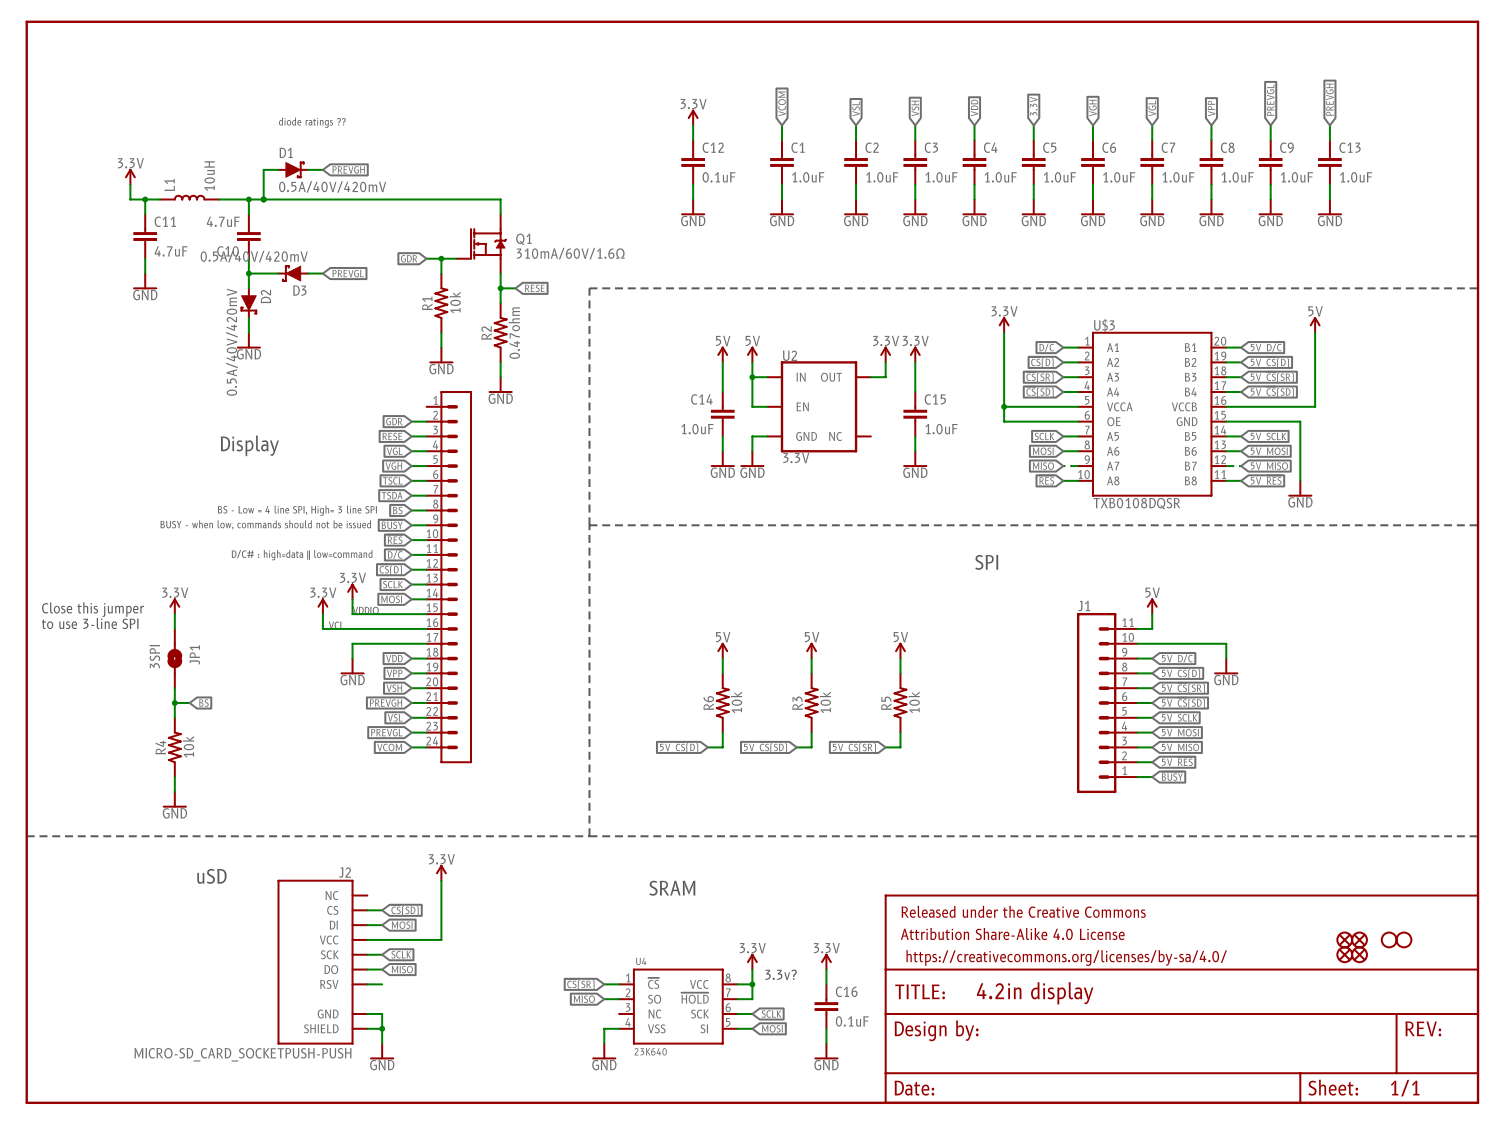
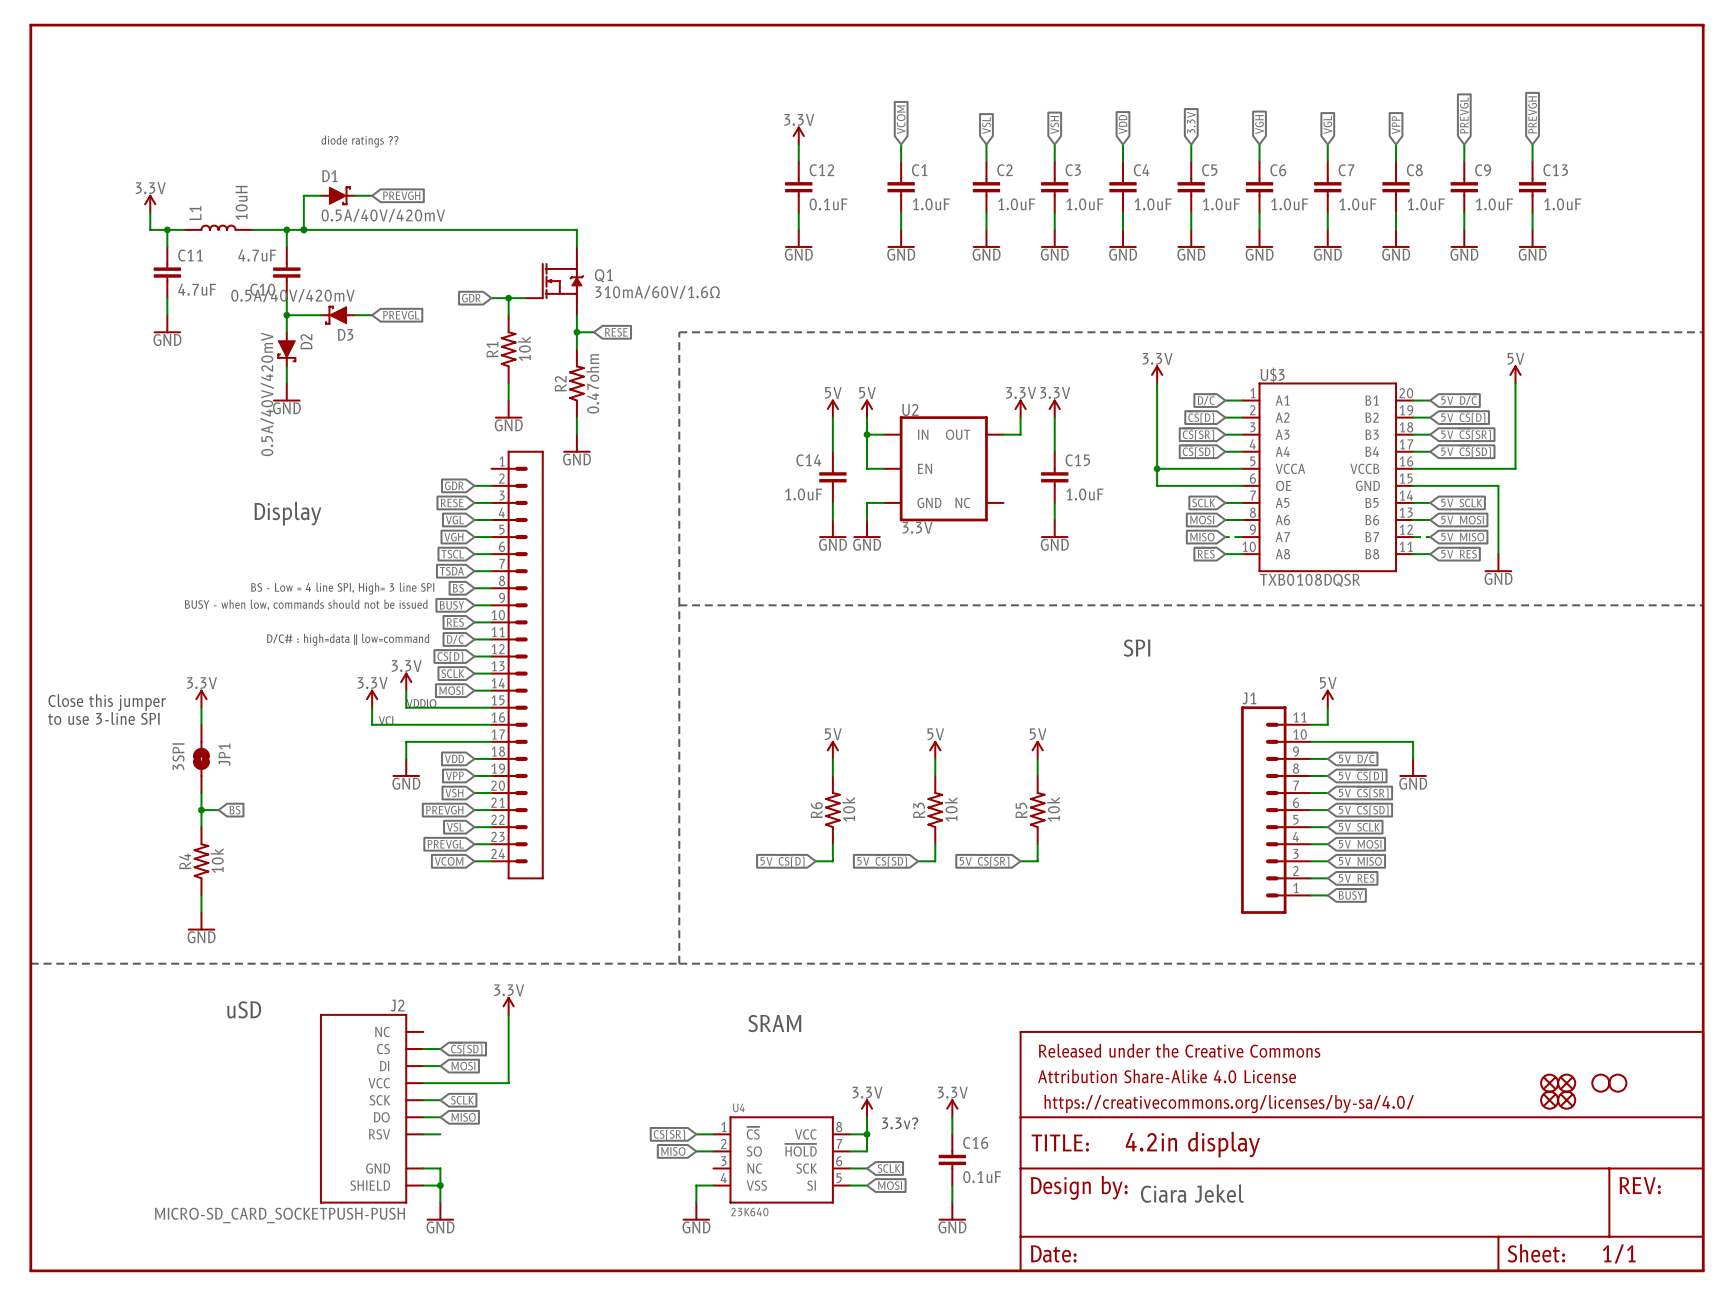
text: none -> Ciara Jekel (1192, 1193)

